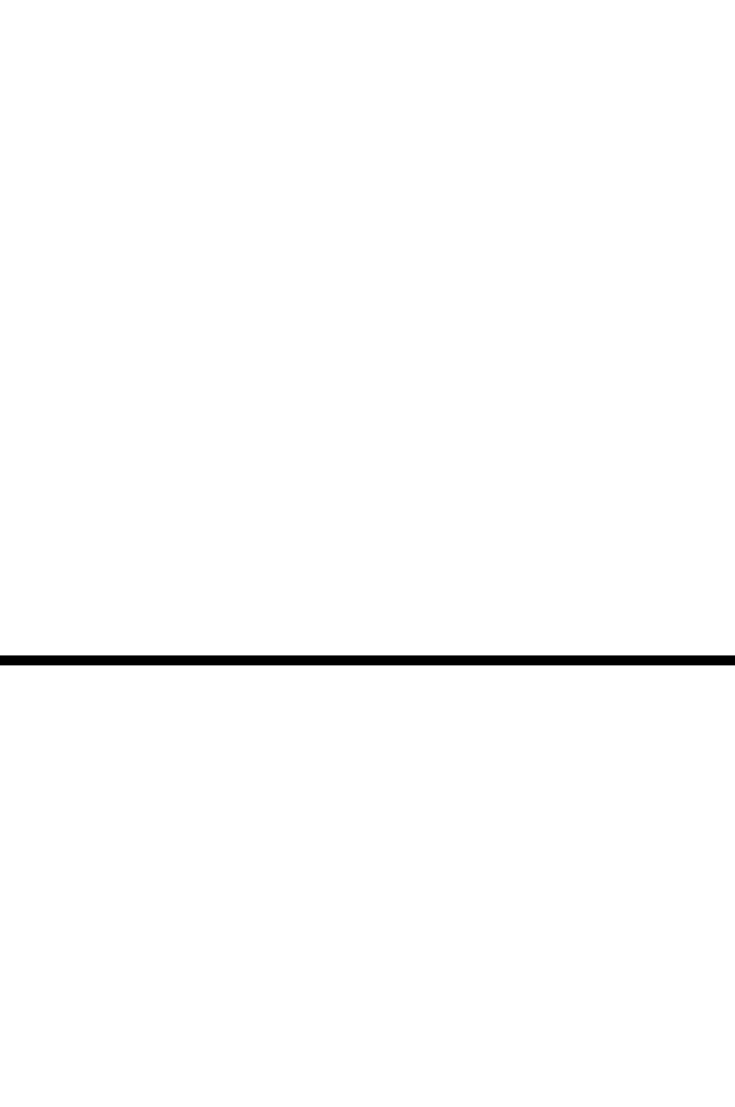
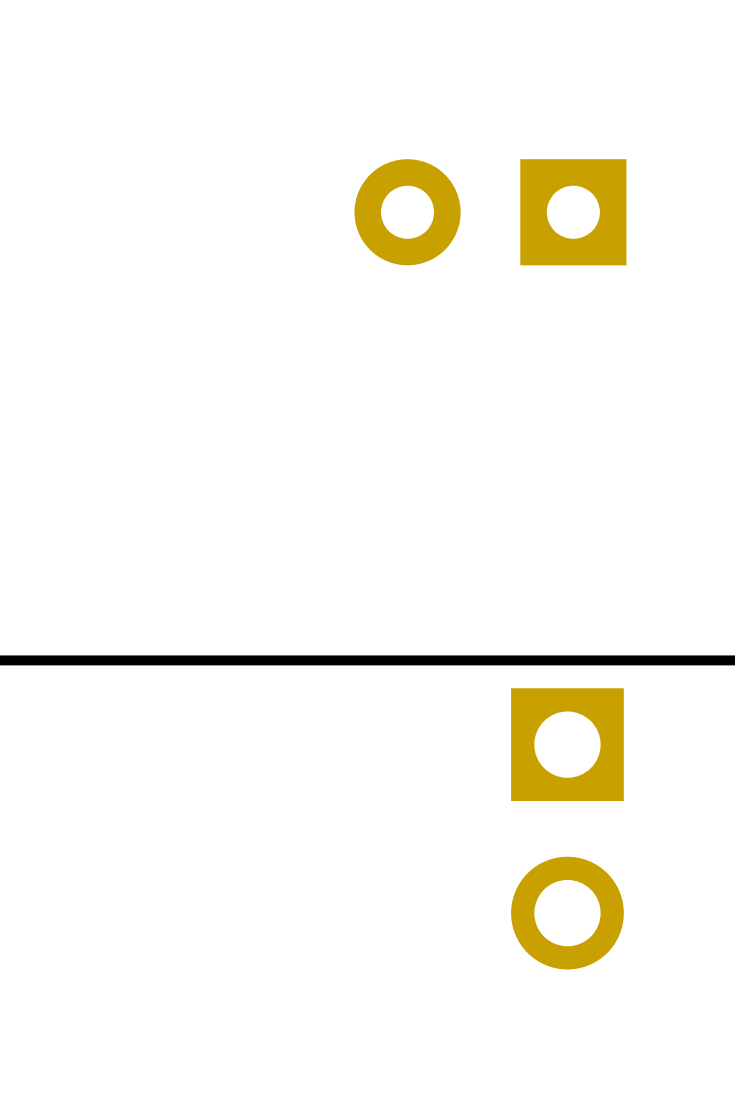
part: none -> (490, 212)
part: none -> (567, 828)

